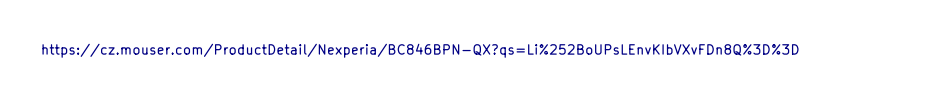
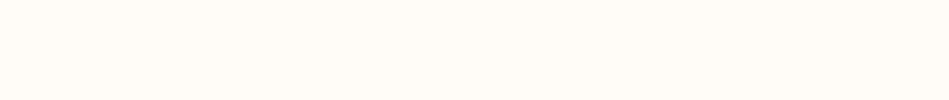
text: https://cz.mouser.com/ProductDetail/Nexperia/BC846BPN-QX?qs=Li%252BoUPsLEnvKIbVXvFDn8Q%3D%3D (420, 50) -> none

